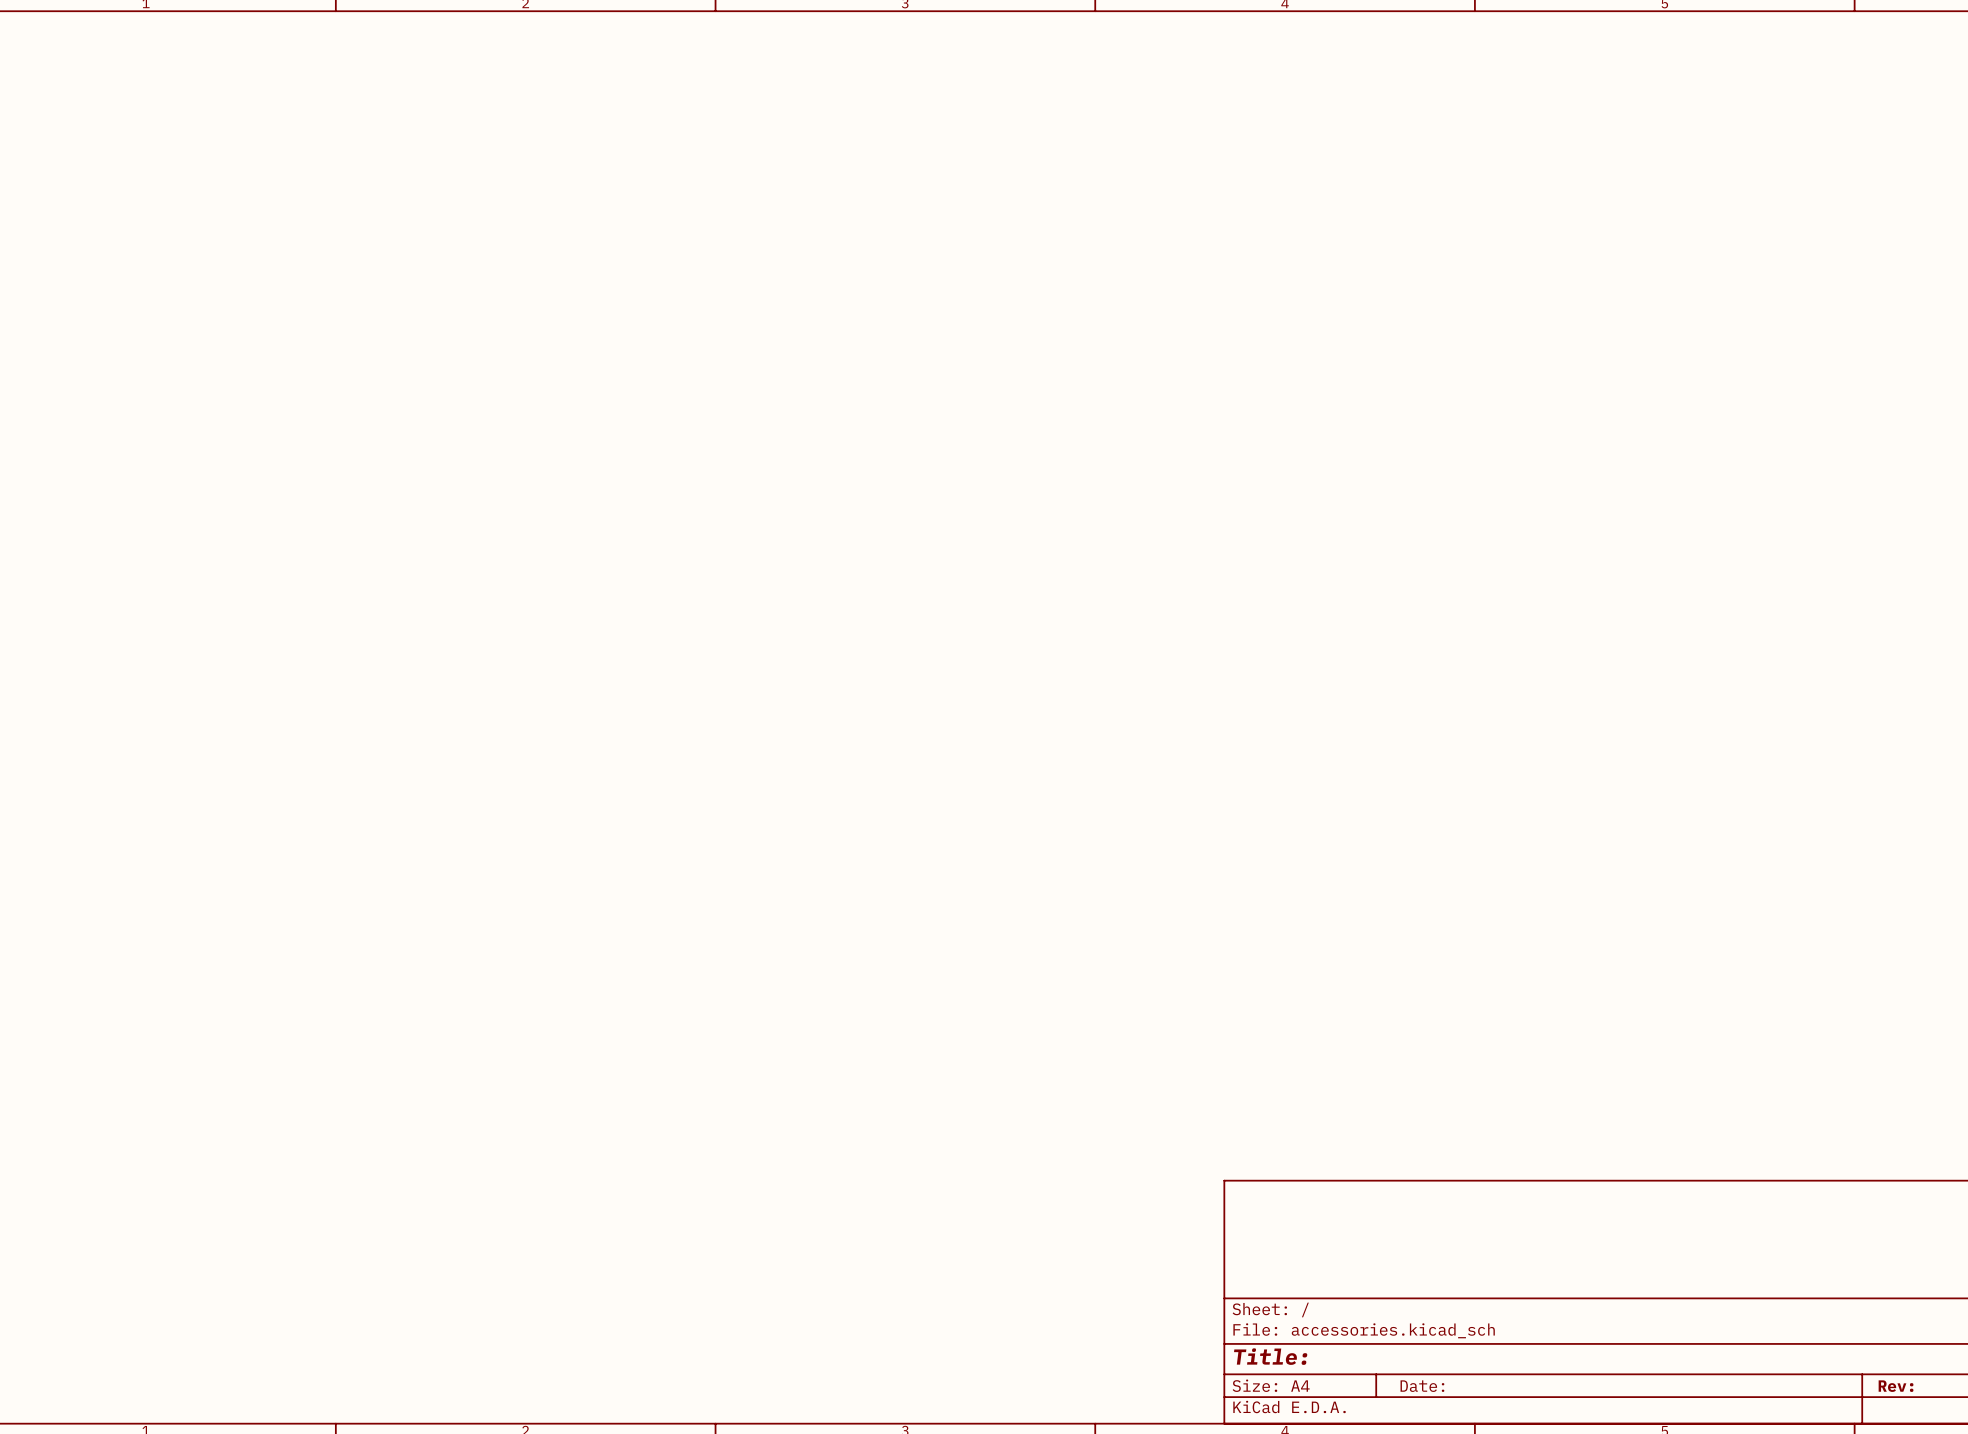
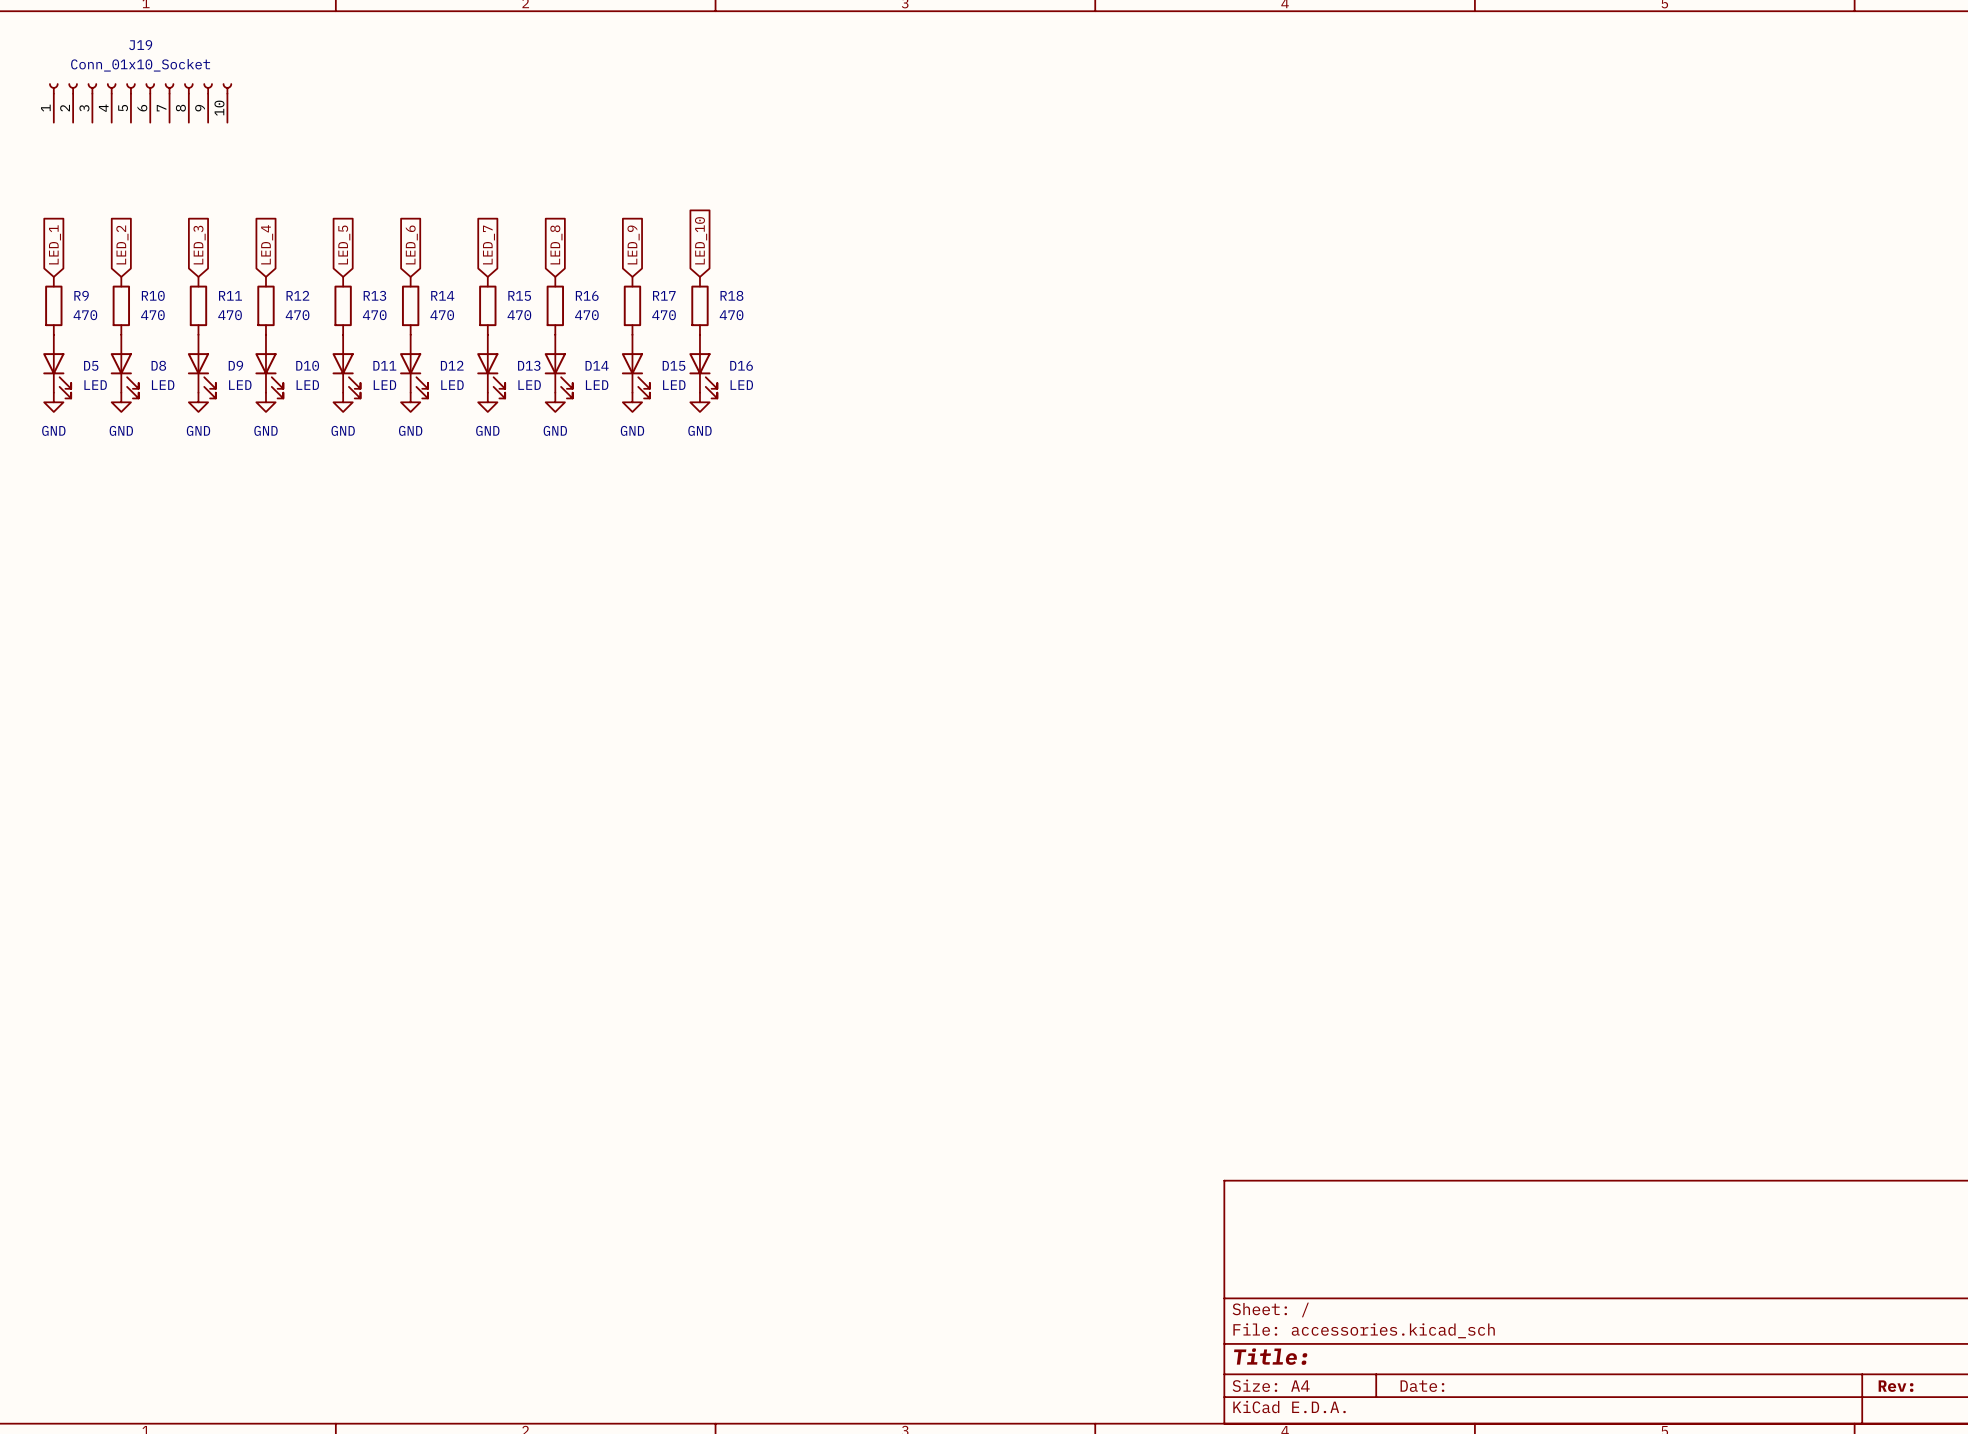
J19: none -> Conn_01x10_Socket (140, 103)
global label: none -> LED_10 (701, 240)
global label: none -> LED_1 (54, 244)
global label: none -> LED_2 (122, 244)
global label: none -> LED_4 (267, 244)
global label: none -> LED_5 (344, 244)
global label: none -> LED_6 (411, 244)
global label: none -> LED_8 (556, 244)
global label: none -> LED_9 (633, 244)
global label: none -> LED_3 (199, 245)
global label: none -> LED_7 (488, 245)
R9: none -> 470 (53, 305)
R10: none -> 470 (121, 305)
R11: none -> 470 (198, 305)
R12: none -> 470 (265, 305)
R13: none -> 470 (343, 305)
R14: none -> 470 (410, 305)
R15: none -> 470 (487, 305)
R16: none -> 470 (555, 305)
R17: none -> 470 (632, 305)
R18: none -> 470 (699, 305)
D5: none -> LED (57, 366)
D8: none -> LED (124, 366)
D9: none -> LED (201, 366)
D10: none -> LED (269, 366)
D11: none -> LED (346, 366)
D12: none -> LED (414, 366)
D13: none -> LED (491, 366)
D14: none -> LED (558, 366)
D15: none -> LED (635, 366)
D16: none -> LED (703, 366)
power symbol: none -> GND (53, 402)
power symbol: none -> GND (121, 402)
power symbol: none -> GND (198, 402)
power symbol: none -> GND (265, 402)
power symbol: none -> GND (343, 402)
power symbol: none -> GND (410, 402)
power symbol: none -> GND (487, 402)
power symbol: none -> GND (555, 402)
power symbol: none -> GND (632, 402)
power symbol: none -> GND (699, 402)

